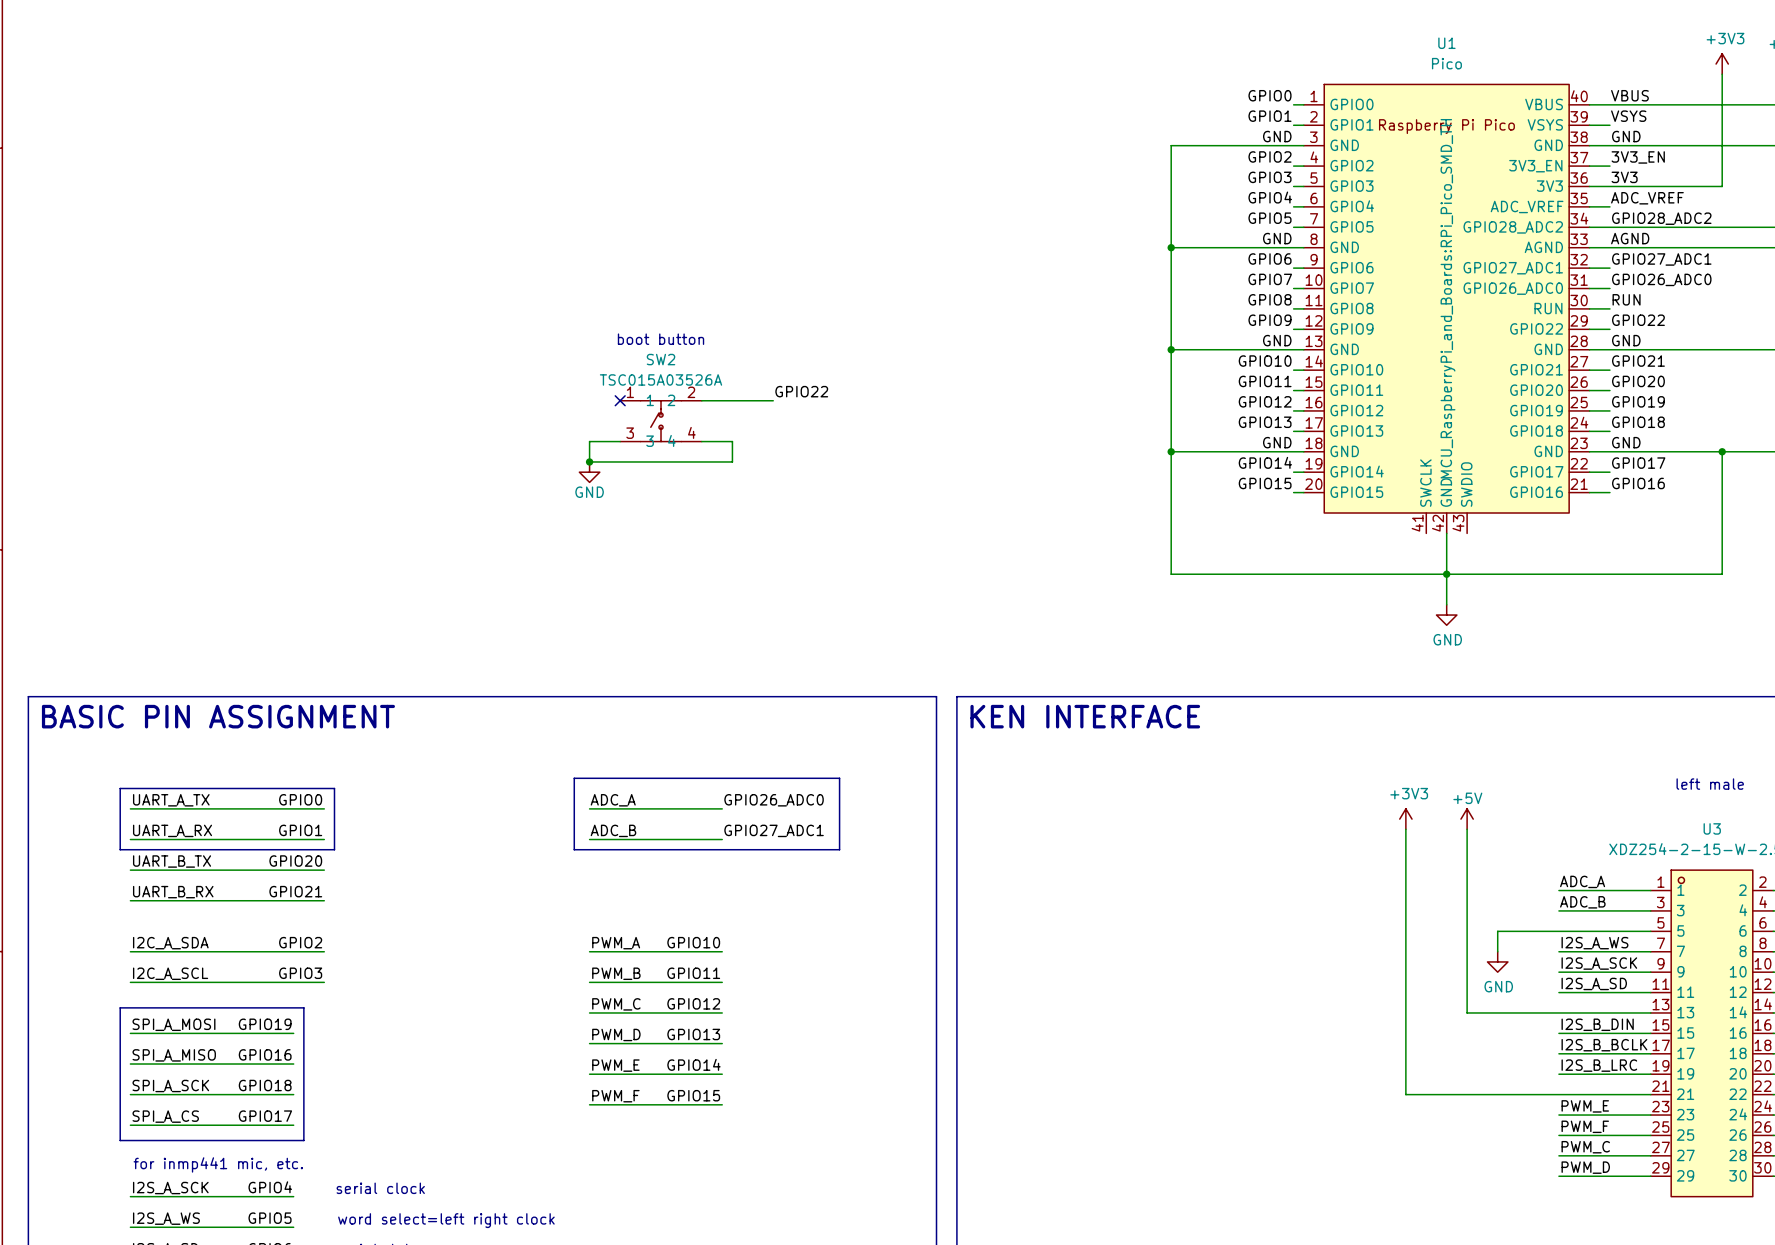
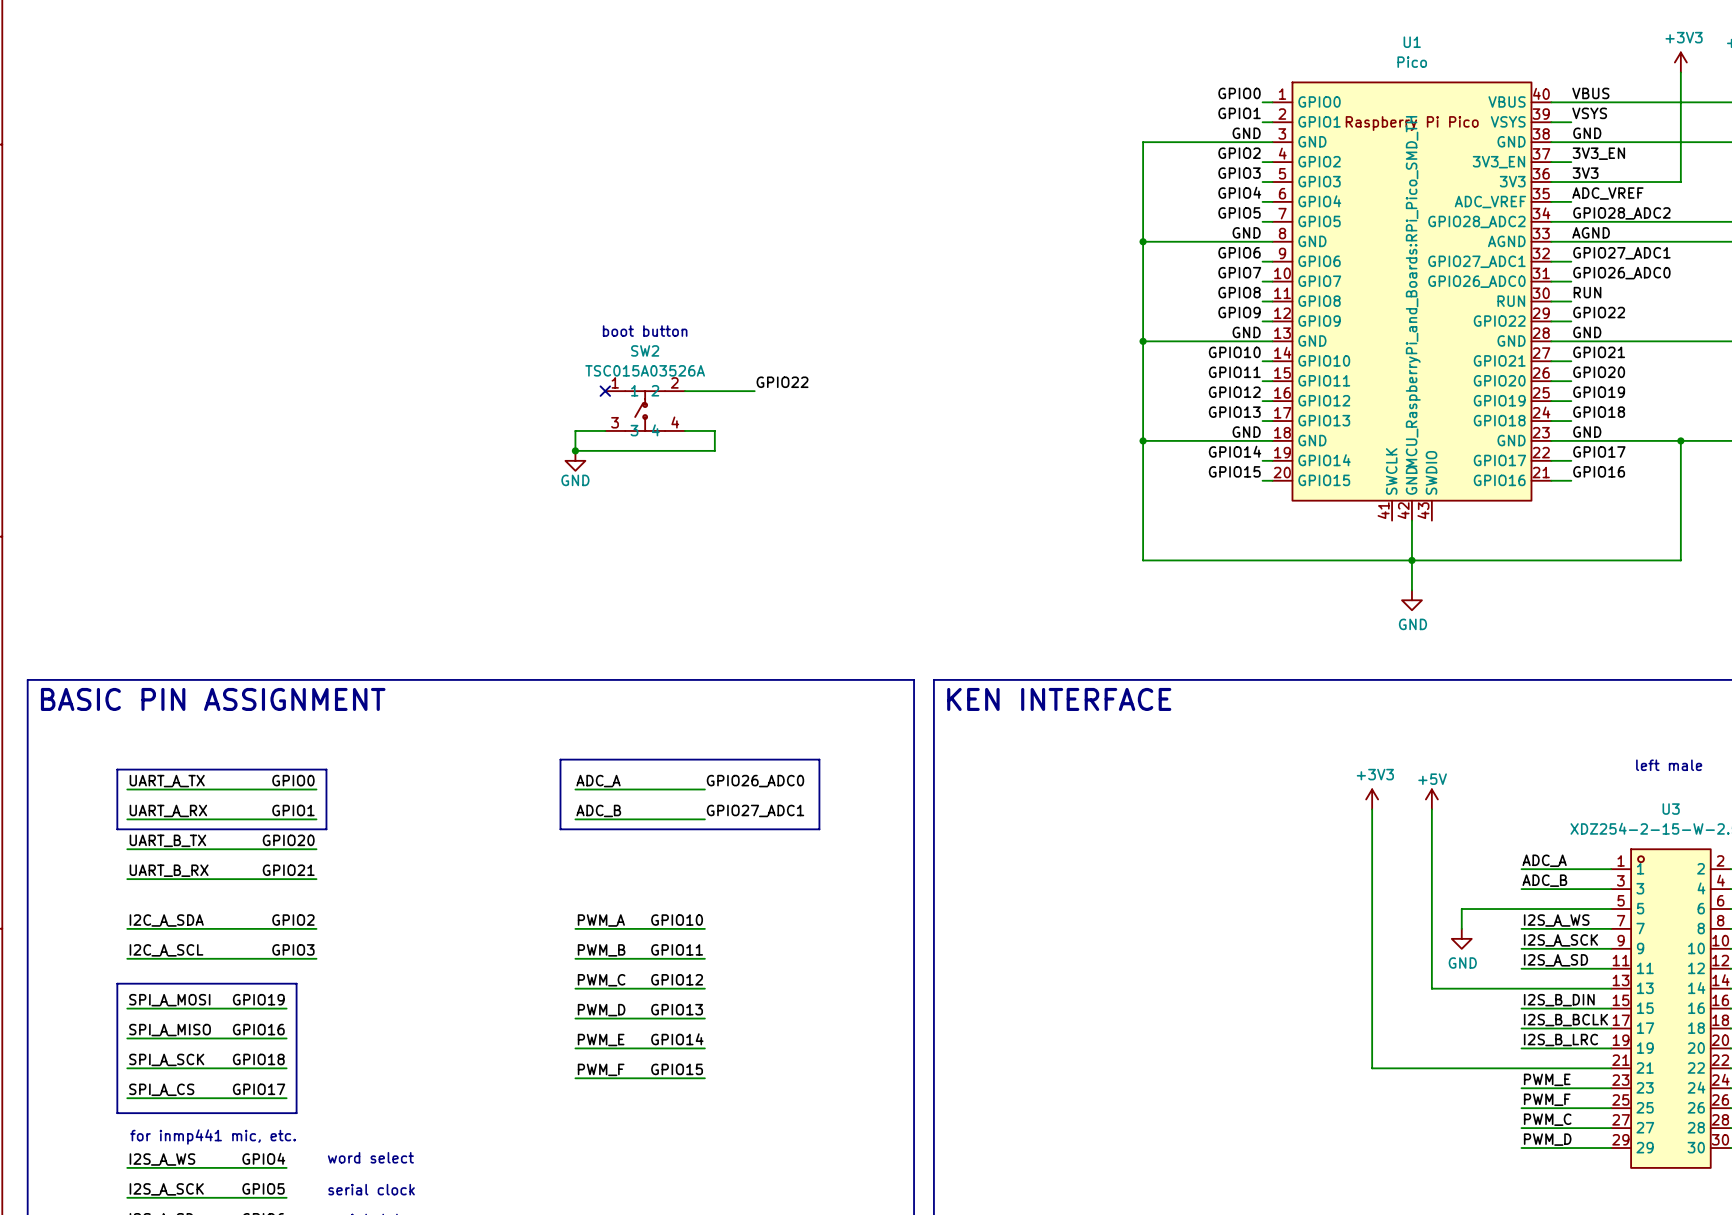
label: I2S_A_SCK (170, 1188) -> I2S_A_WS (162, 1159)
text: serial clock (380, 1188) -> word select (370, 1157)
label: I2S_A_WS (166, 1218) -> I2S_A_SCK (166, 1189)
text: word select=left right clock (446, 1220) -> serial clock (371, 1189)

